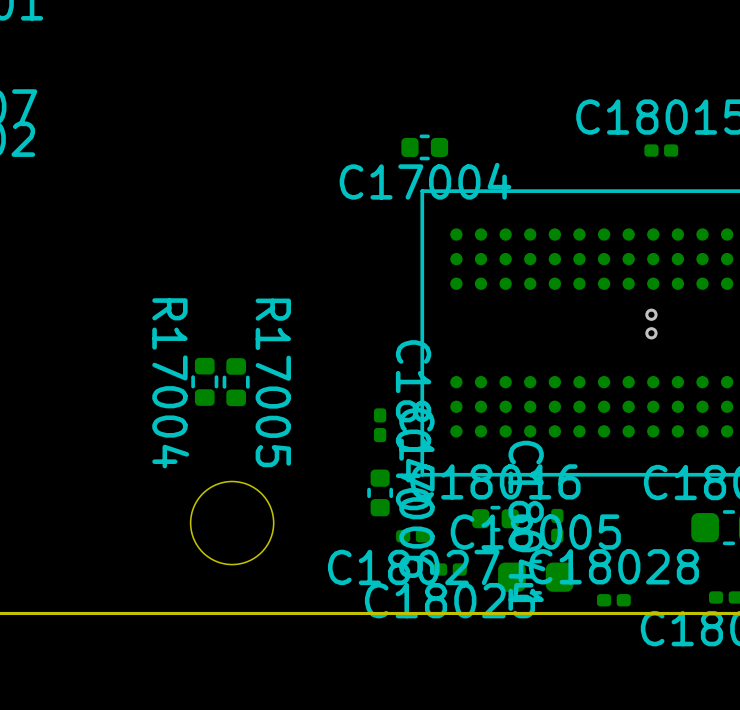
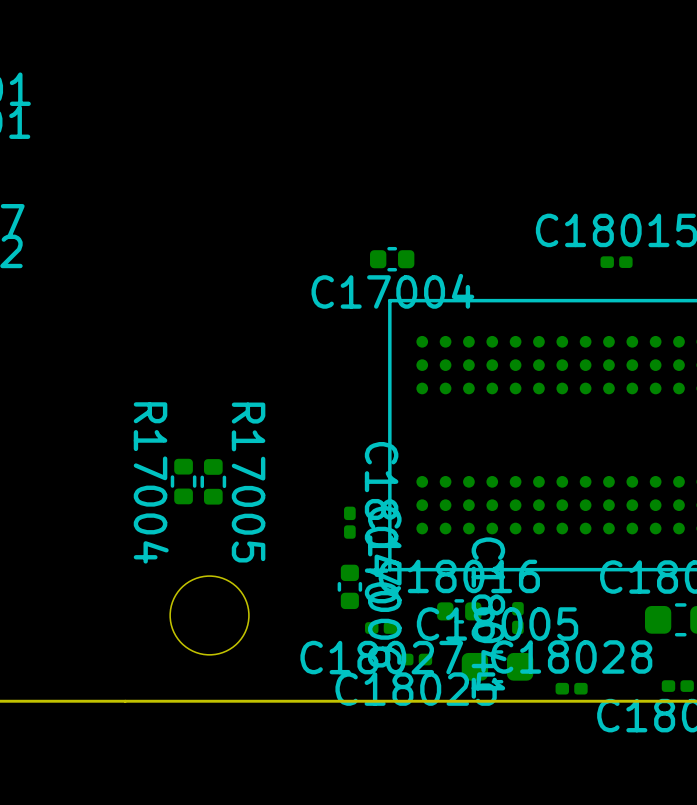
via: (651, 314) -> none
via: (651, 333) -> none

